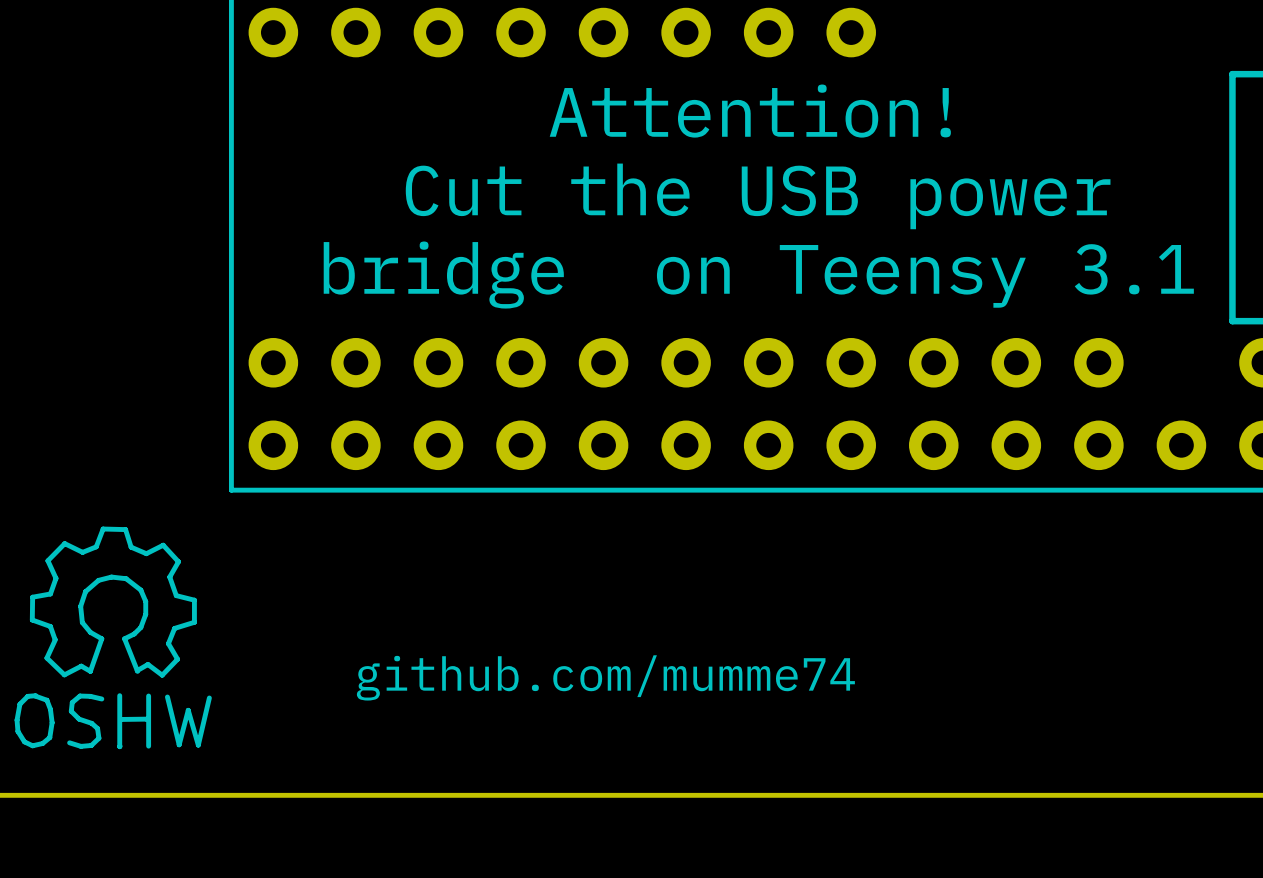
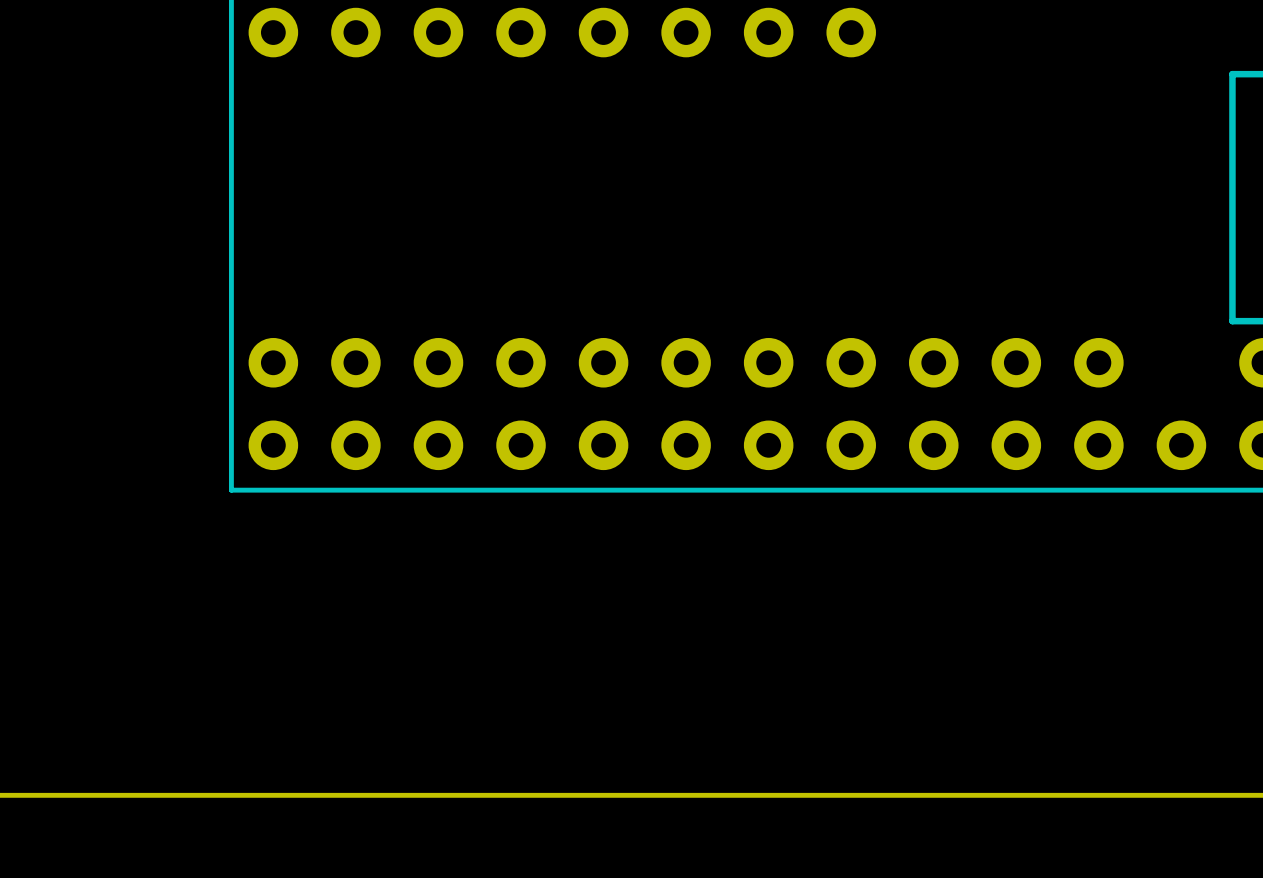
text: Attention! (750, 111) -> none
text: Cut the USB power (758, 196) -> none
text: bridge on Teensy 3.1 (758, 275) -> none
drawing: [14, 526, 212, 750] -> none

